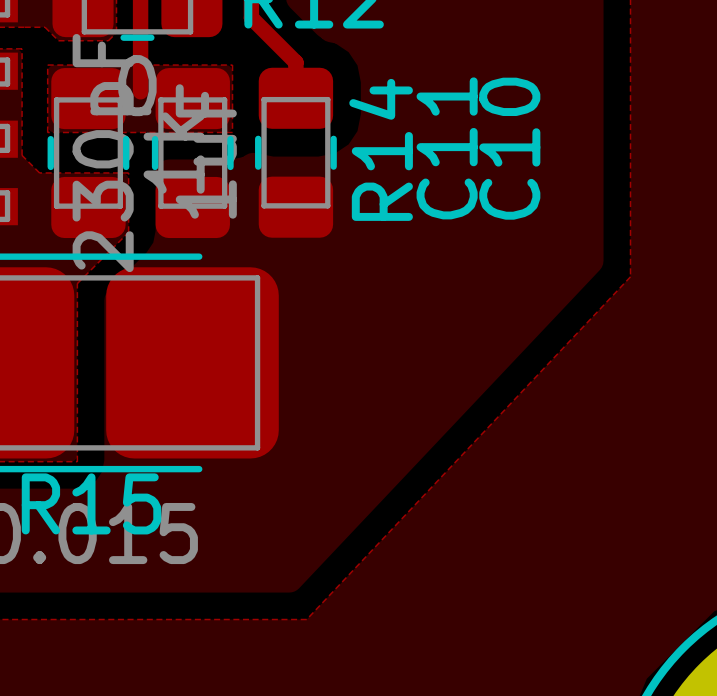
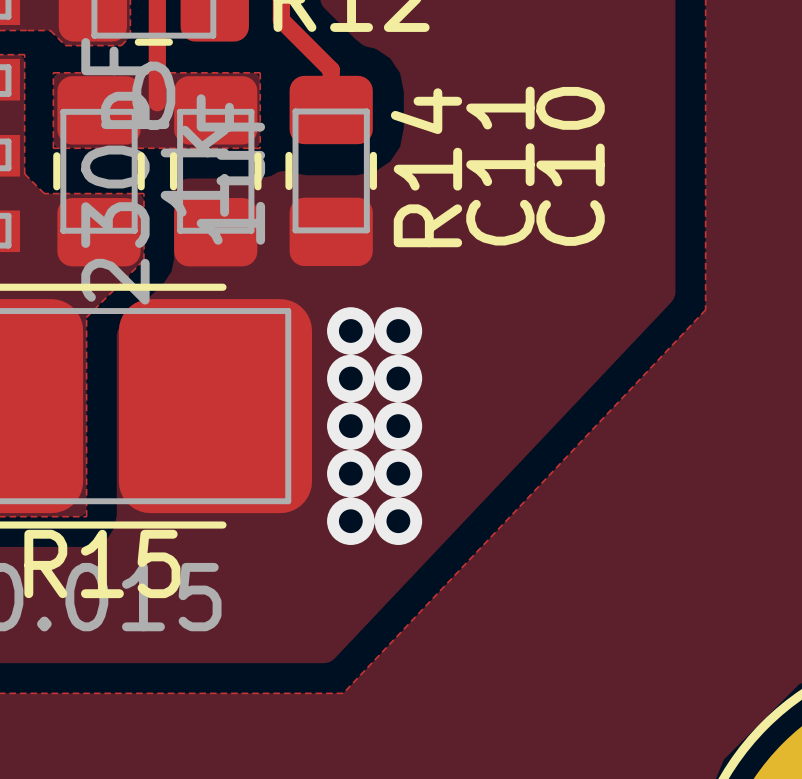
via: none -> (350, 330)
via: none -> (398, 330)
via: none -> (350, 378)
via: none -> (398, 378)
via: none -> (350, 426)
via: none -> (398, 426)
via: none -> (350, 473)
via: none -> (398, 473)
via: none -> (350, 521)
via: none -> (398, 521)

